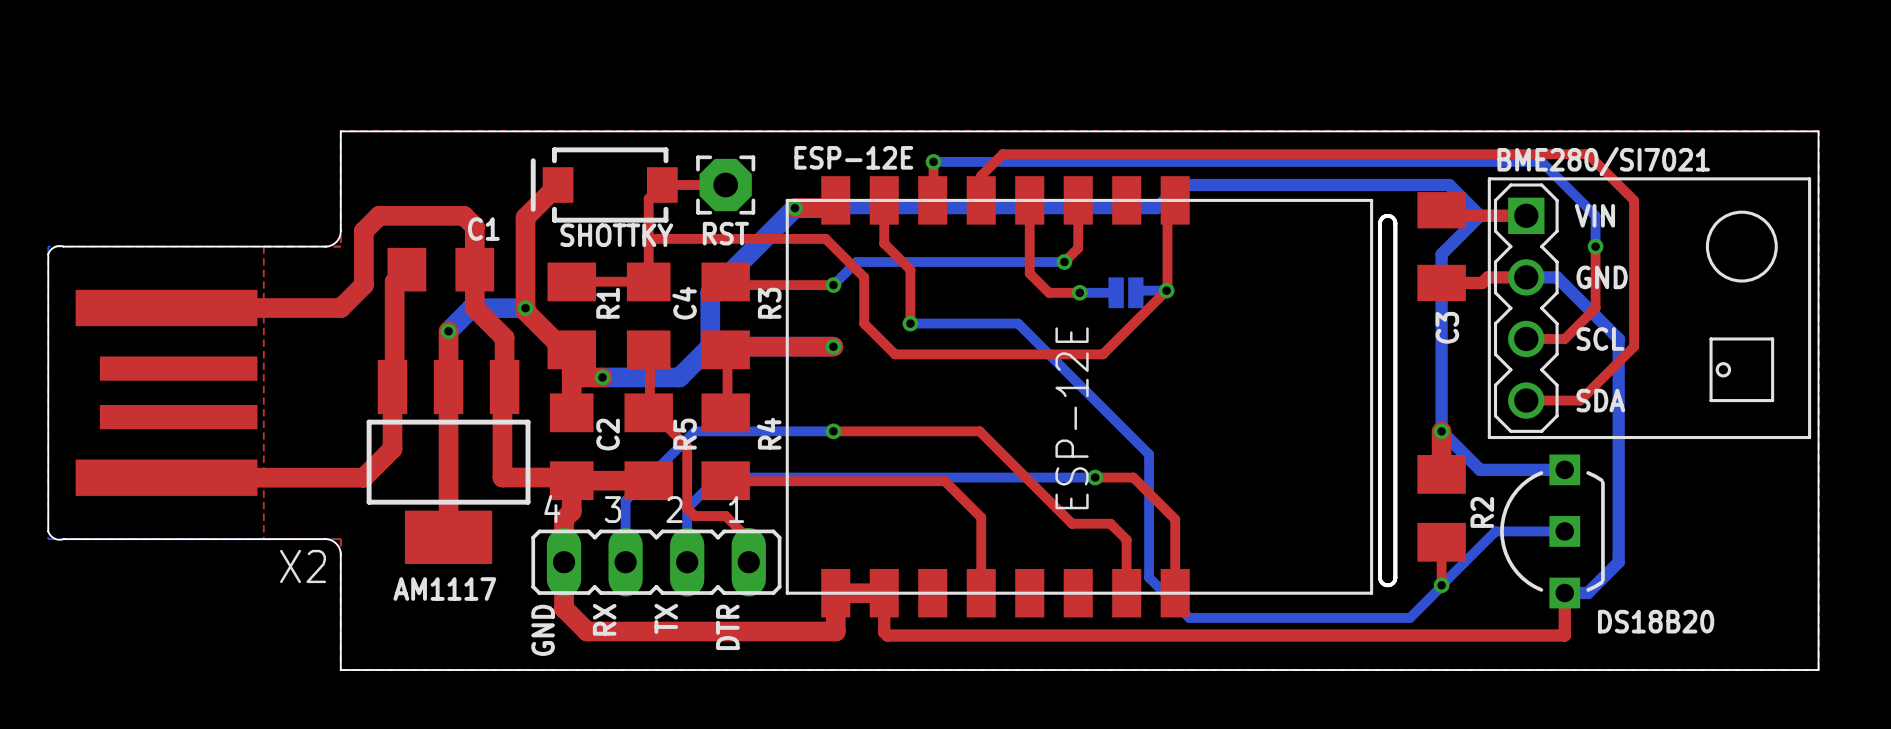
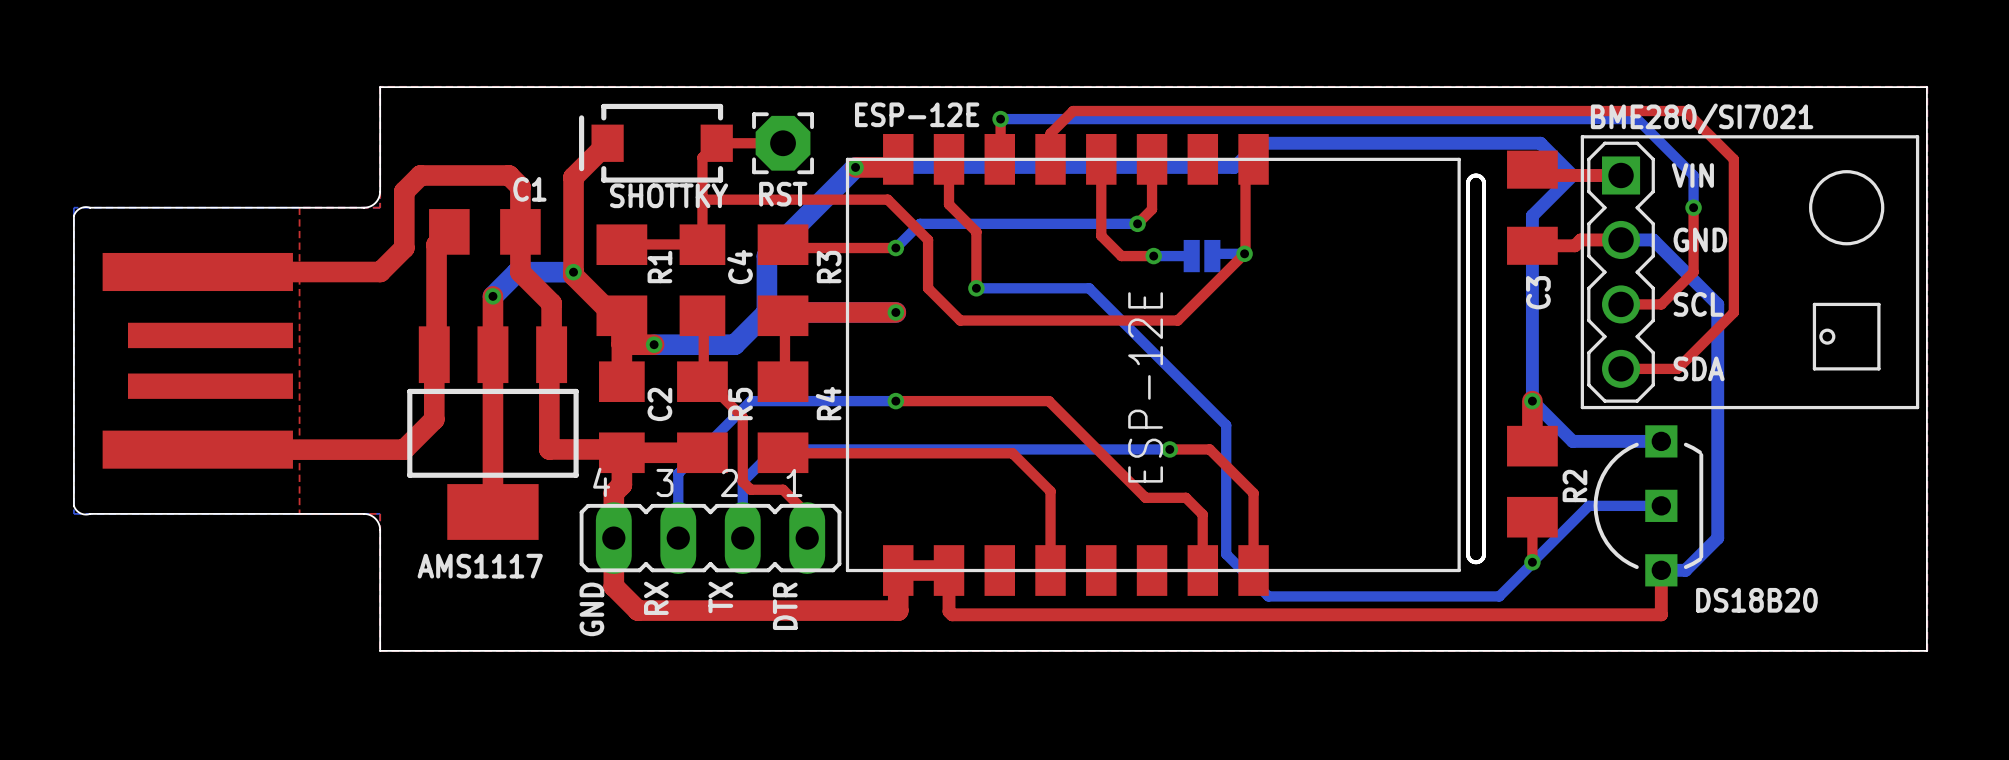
X2 name: X2 (303, 566) -> none
AM1117 name: AM1117 (444, 589) -> AMS1117 (480, 566)

